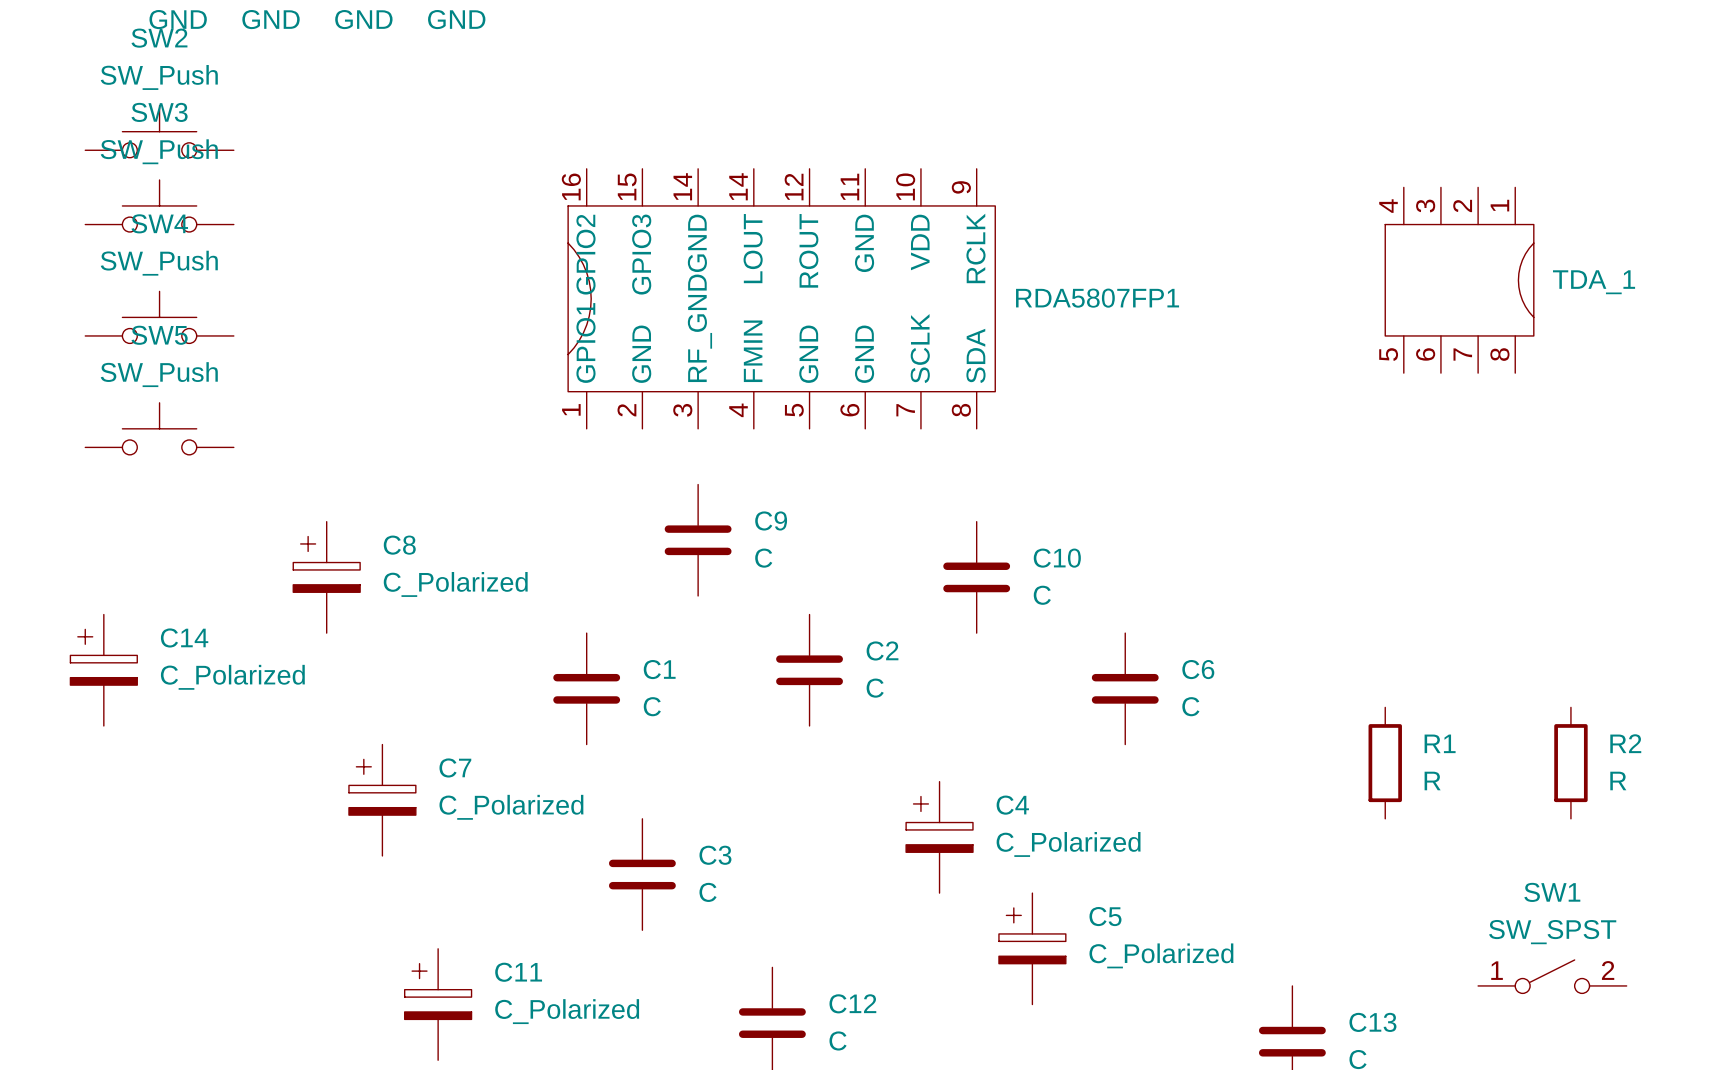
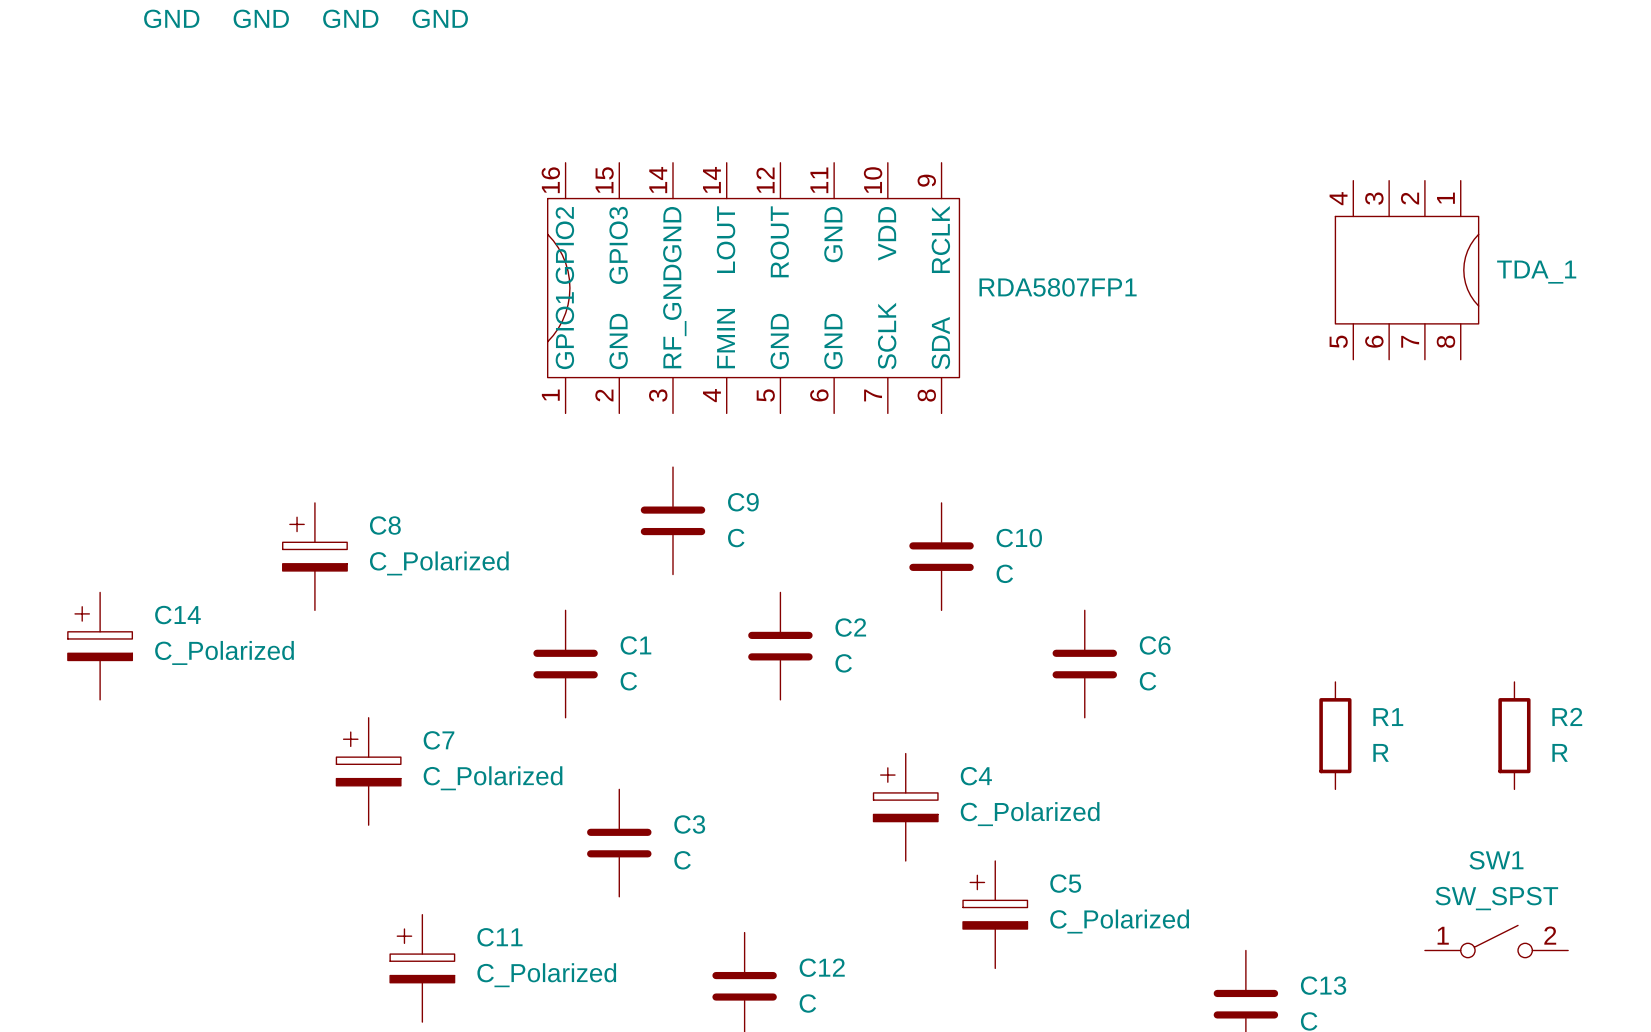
SW2: SW_Push (159, 131) -> none
SW3: SW_Push (159, 205) -> none
SW4: SW_Push (159, 317) -> none
SW5: SW_Push (159, 428) -> none

